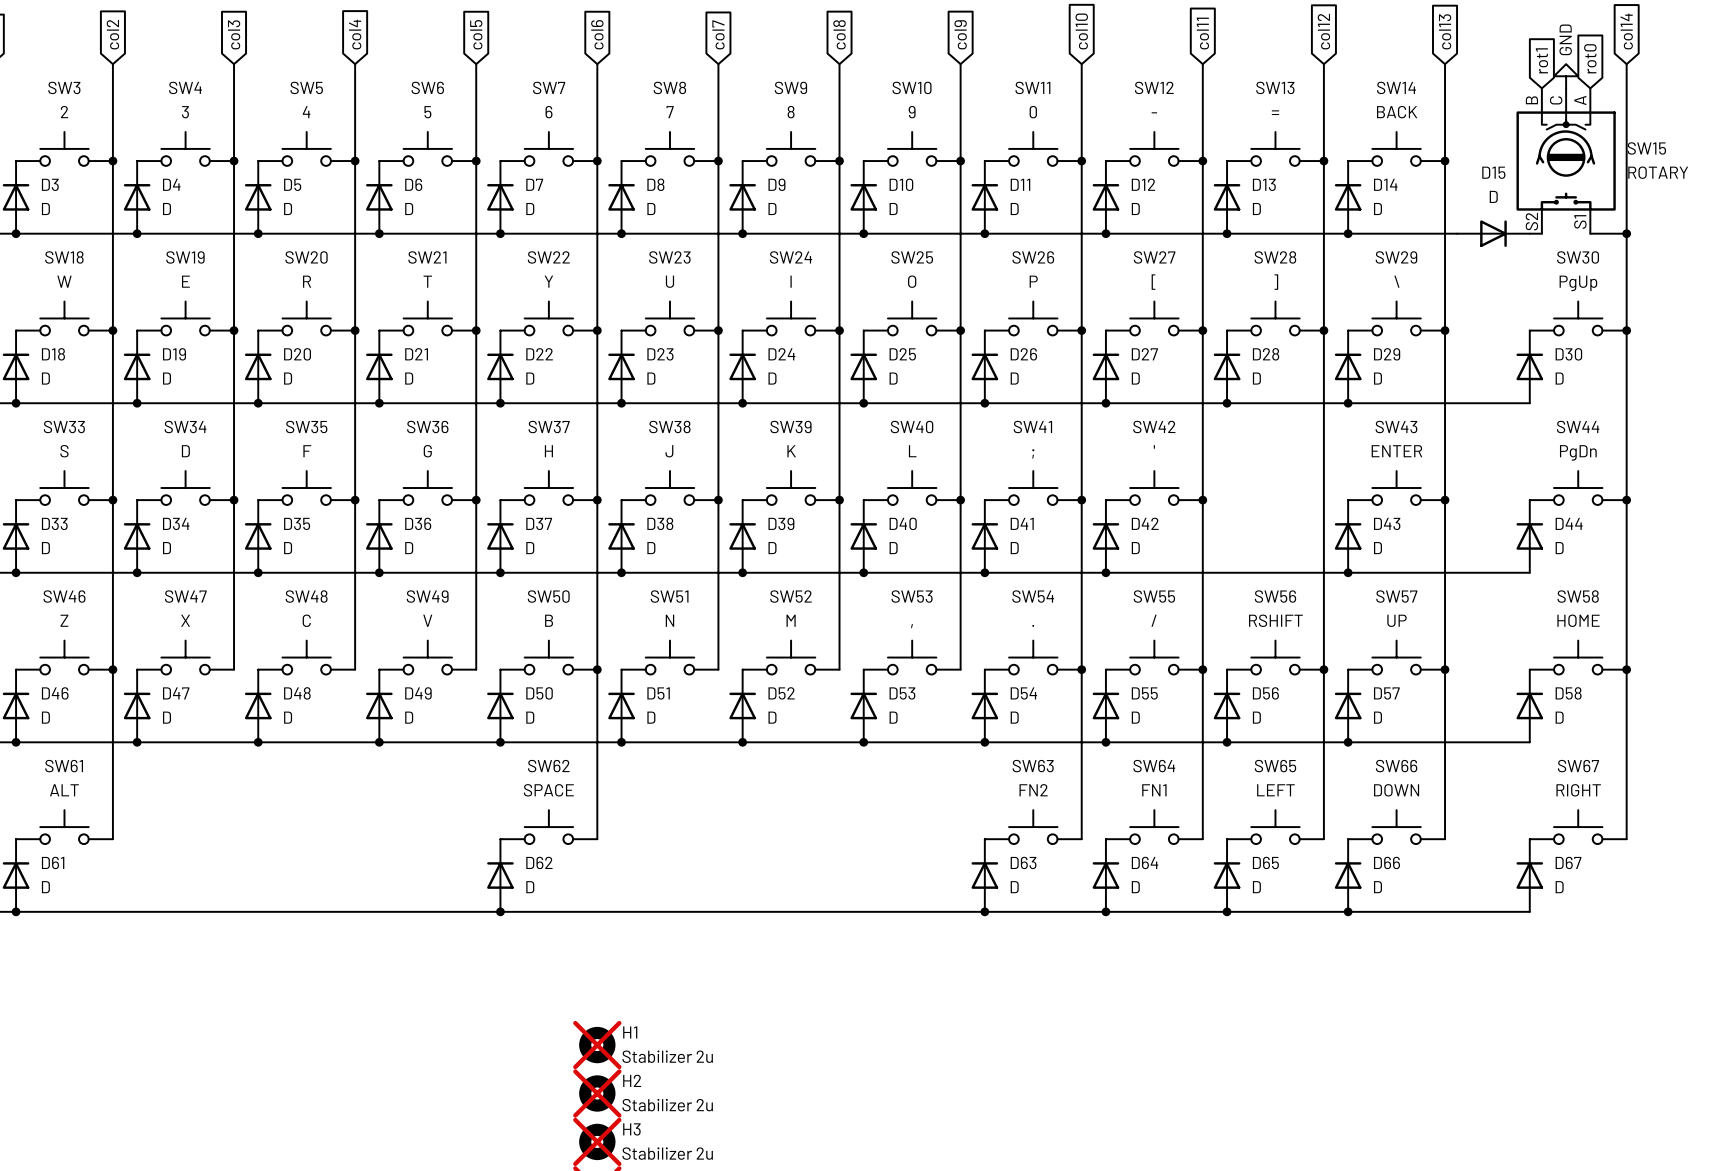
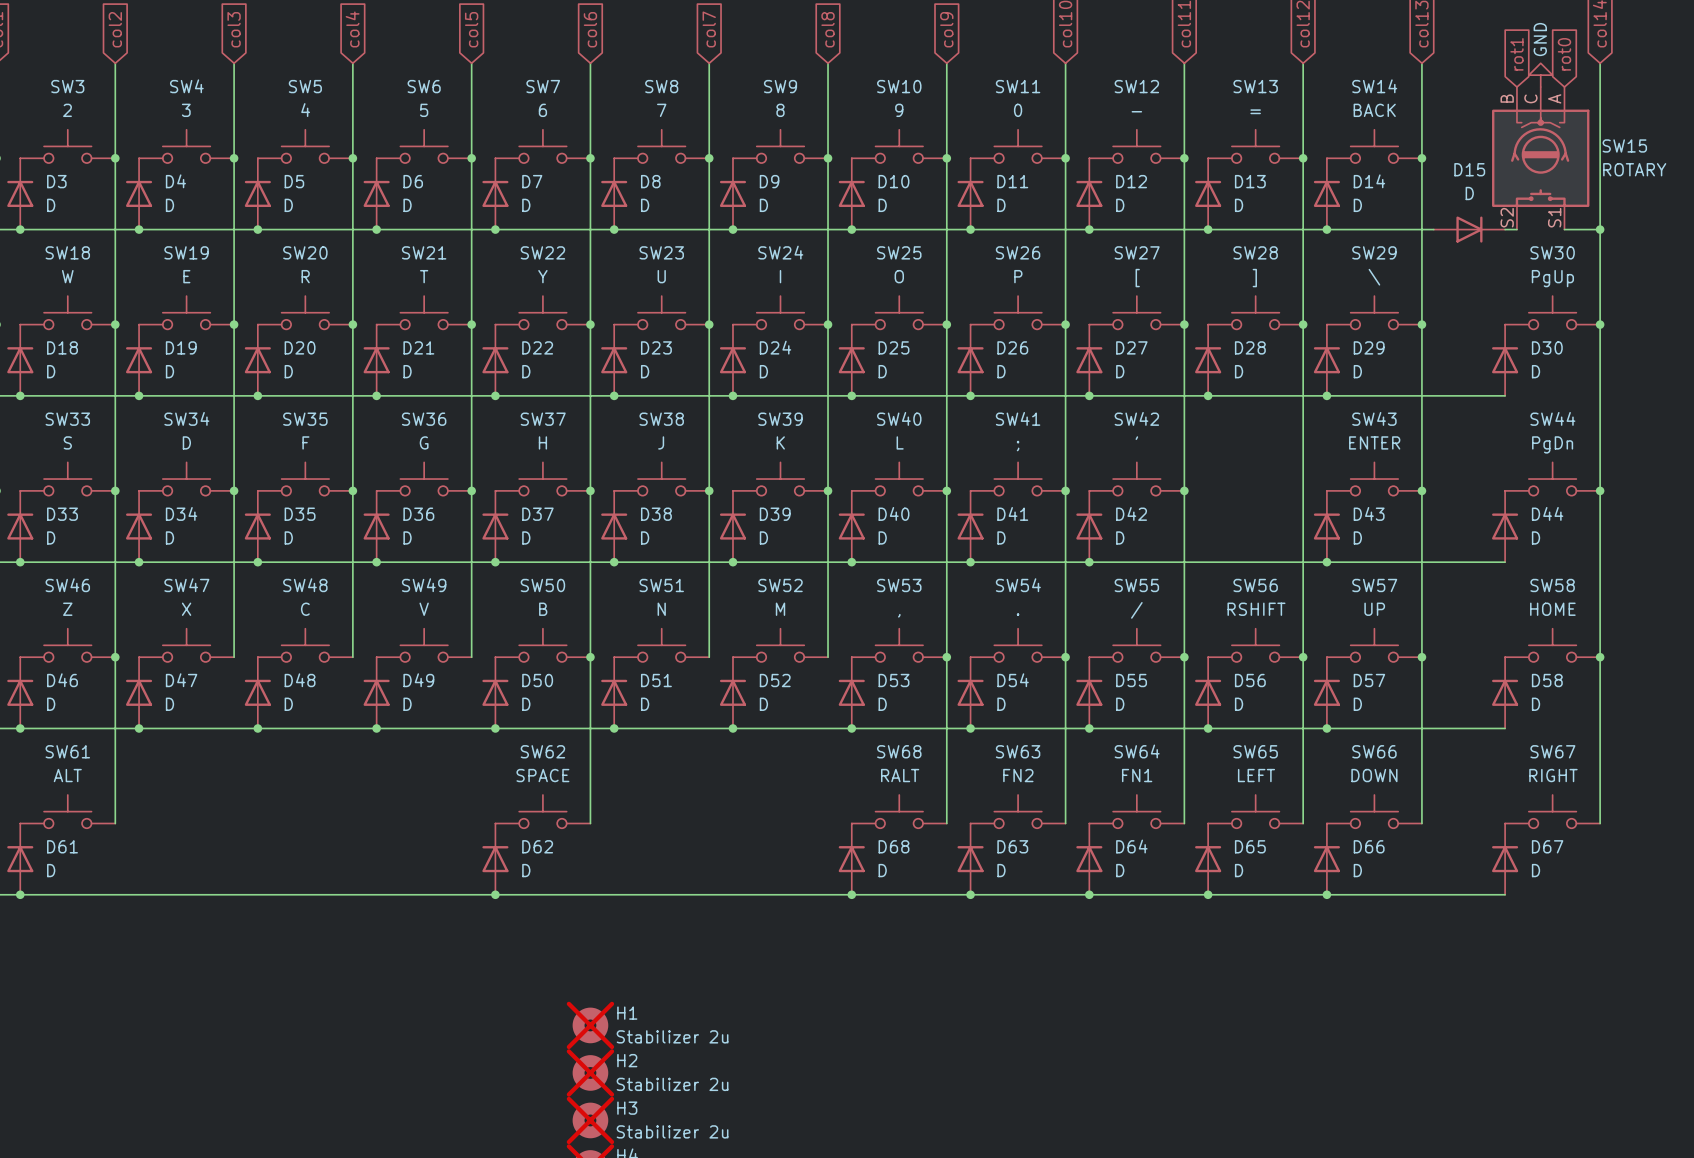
wire: none -> (946, 657) (946, 823)
junction: none -> (946, 657)
SW68: none -> RALT (899, 811)
D68: none -> D (851, 859)
junction: none -> (851, 894)

